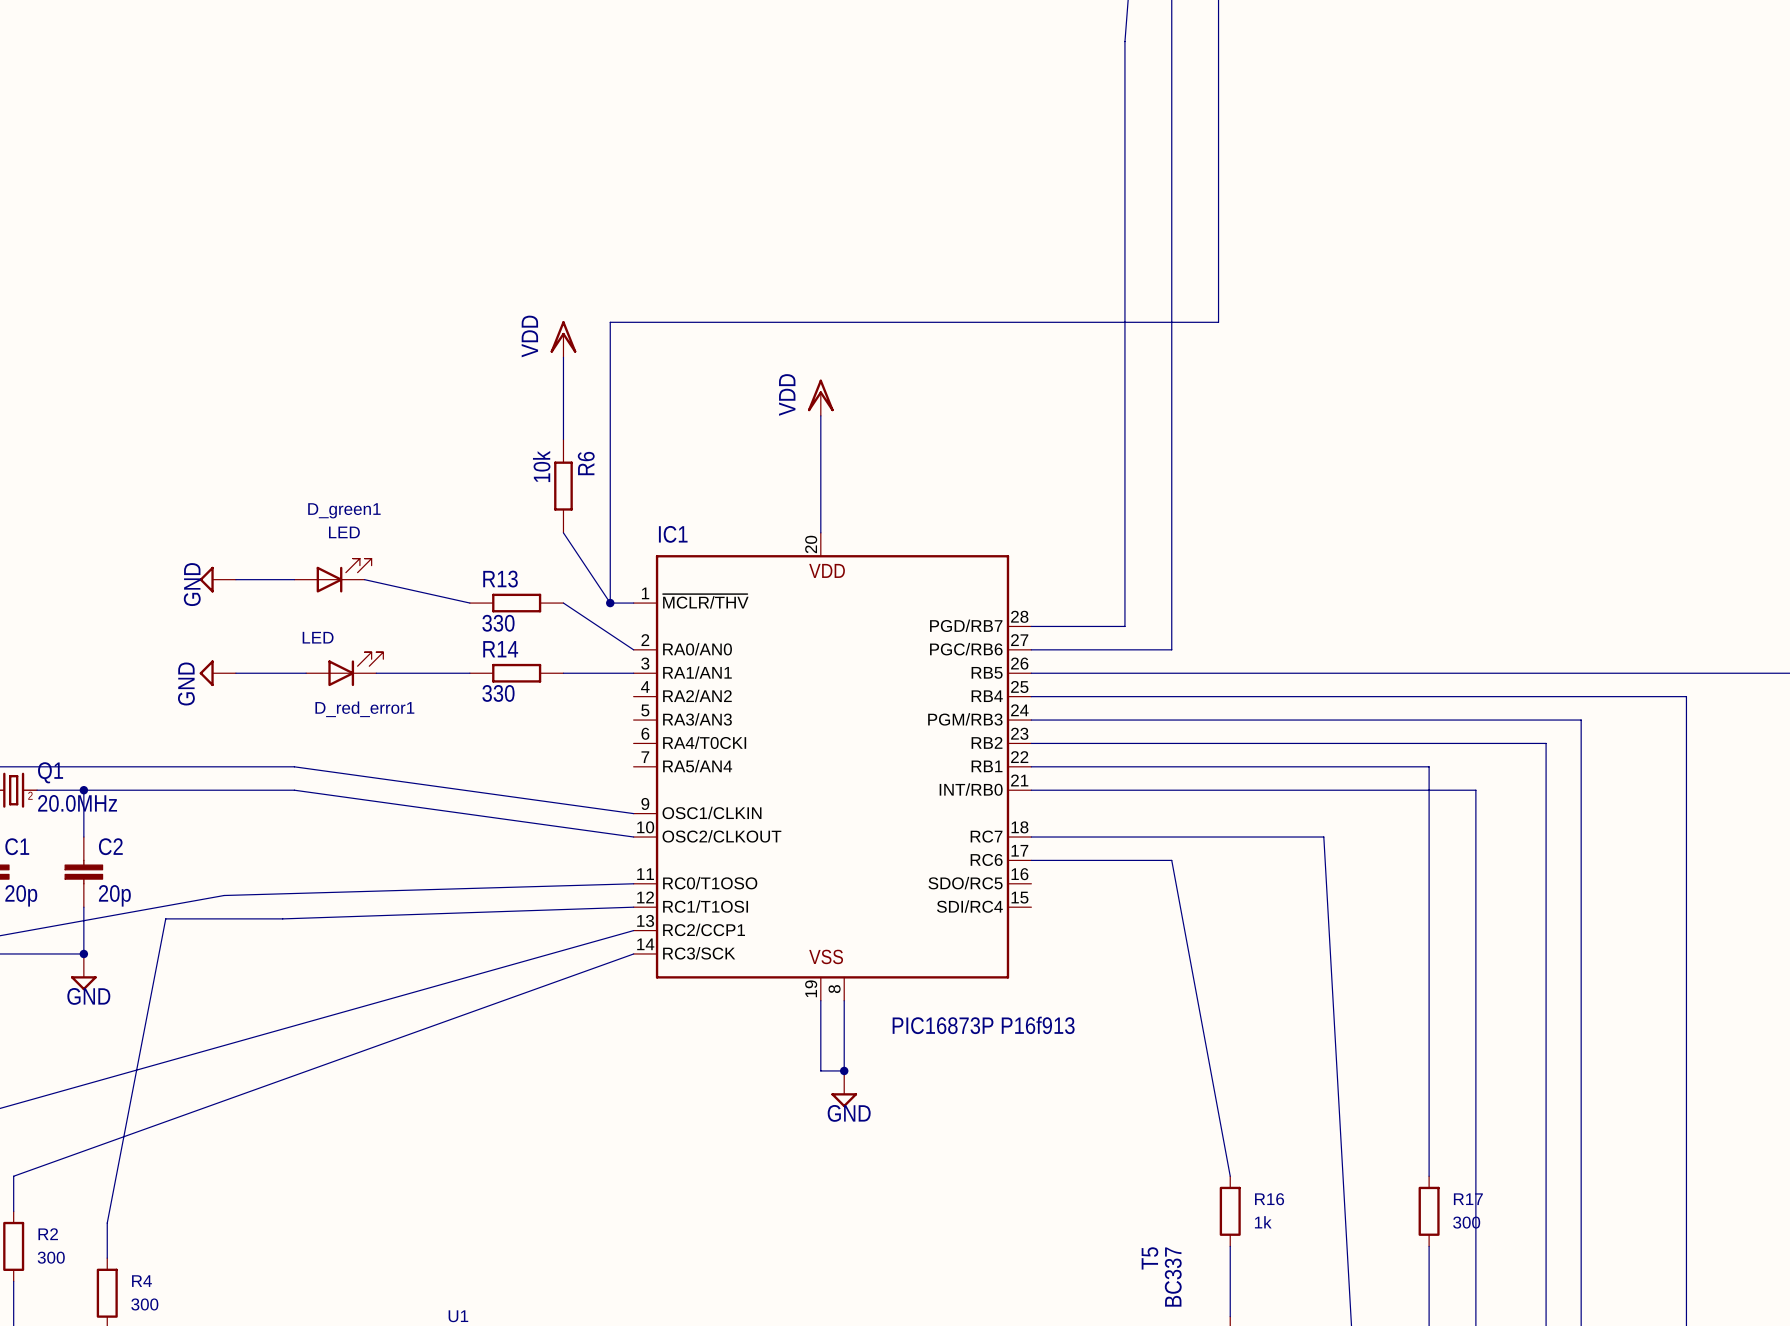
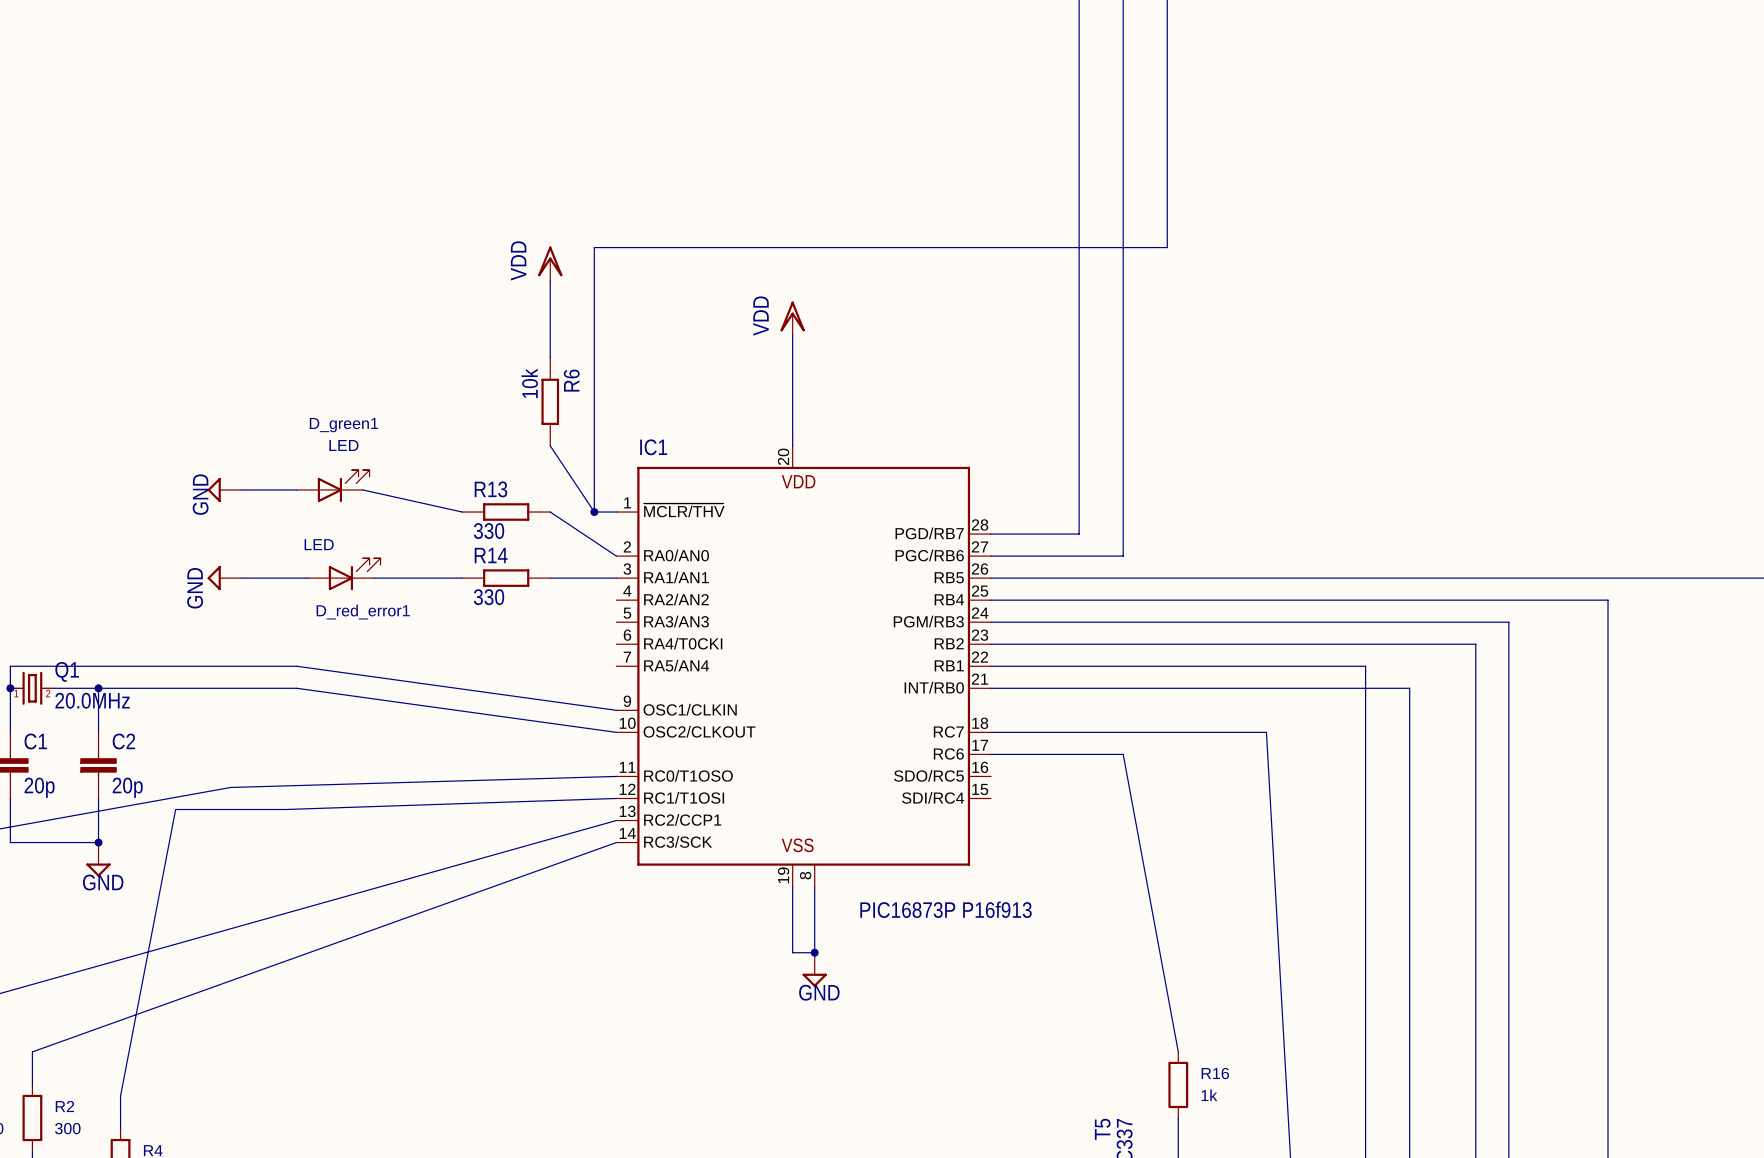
wire: none -> (1365, 1051) (1365, 1118)
R17: 300 (1429, 1211) -> none

